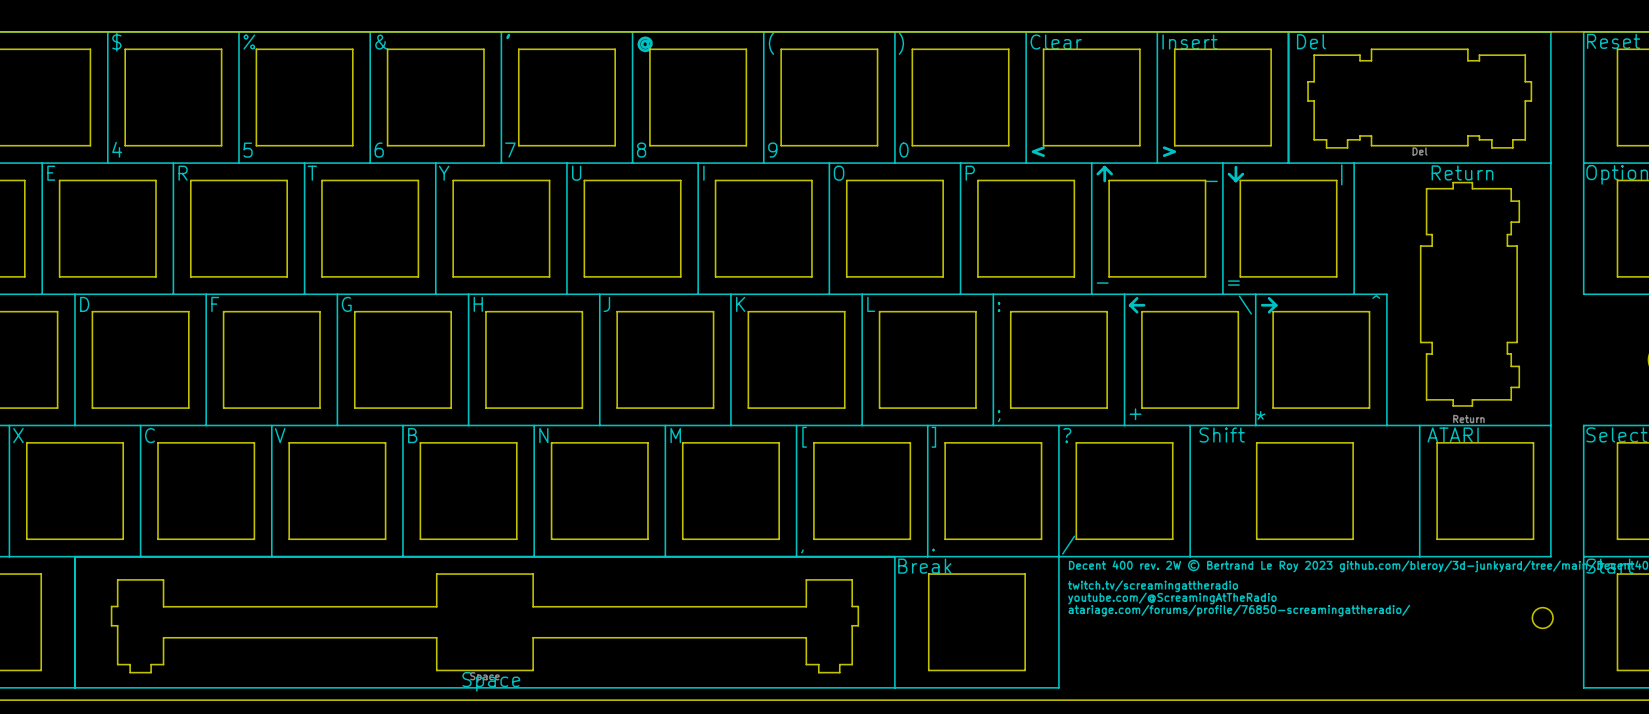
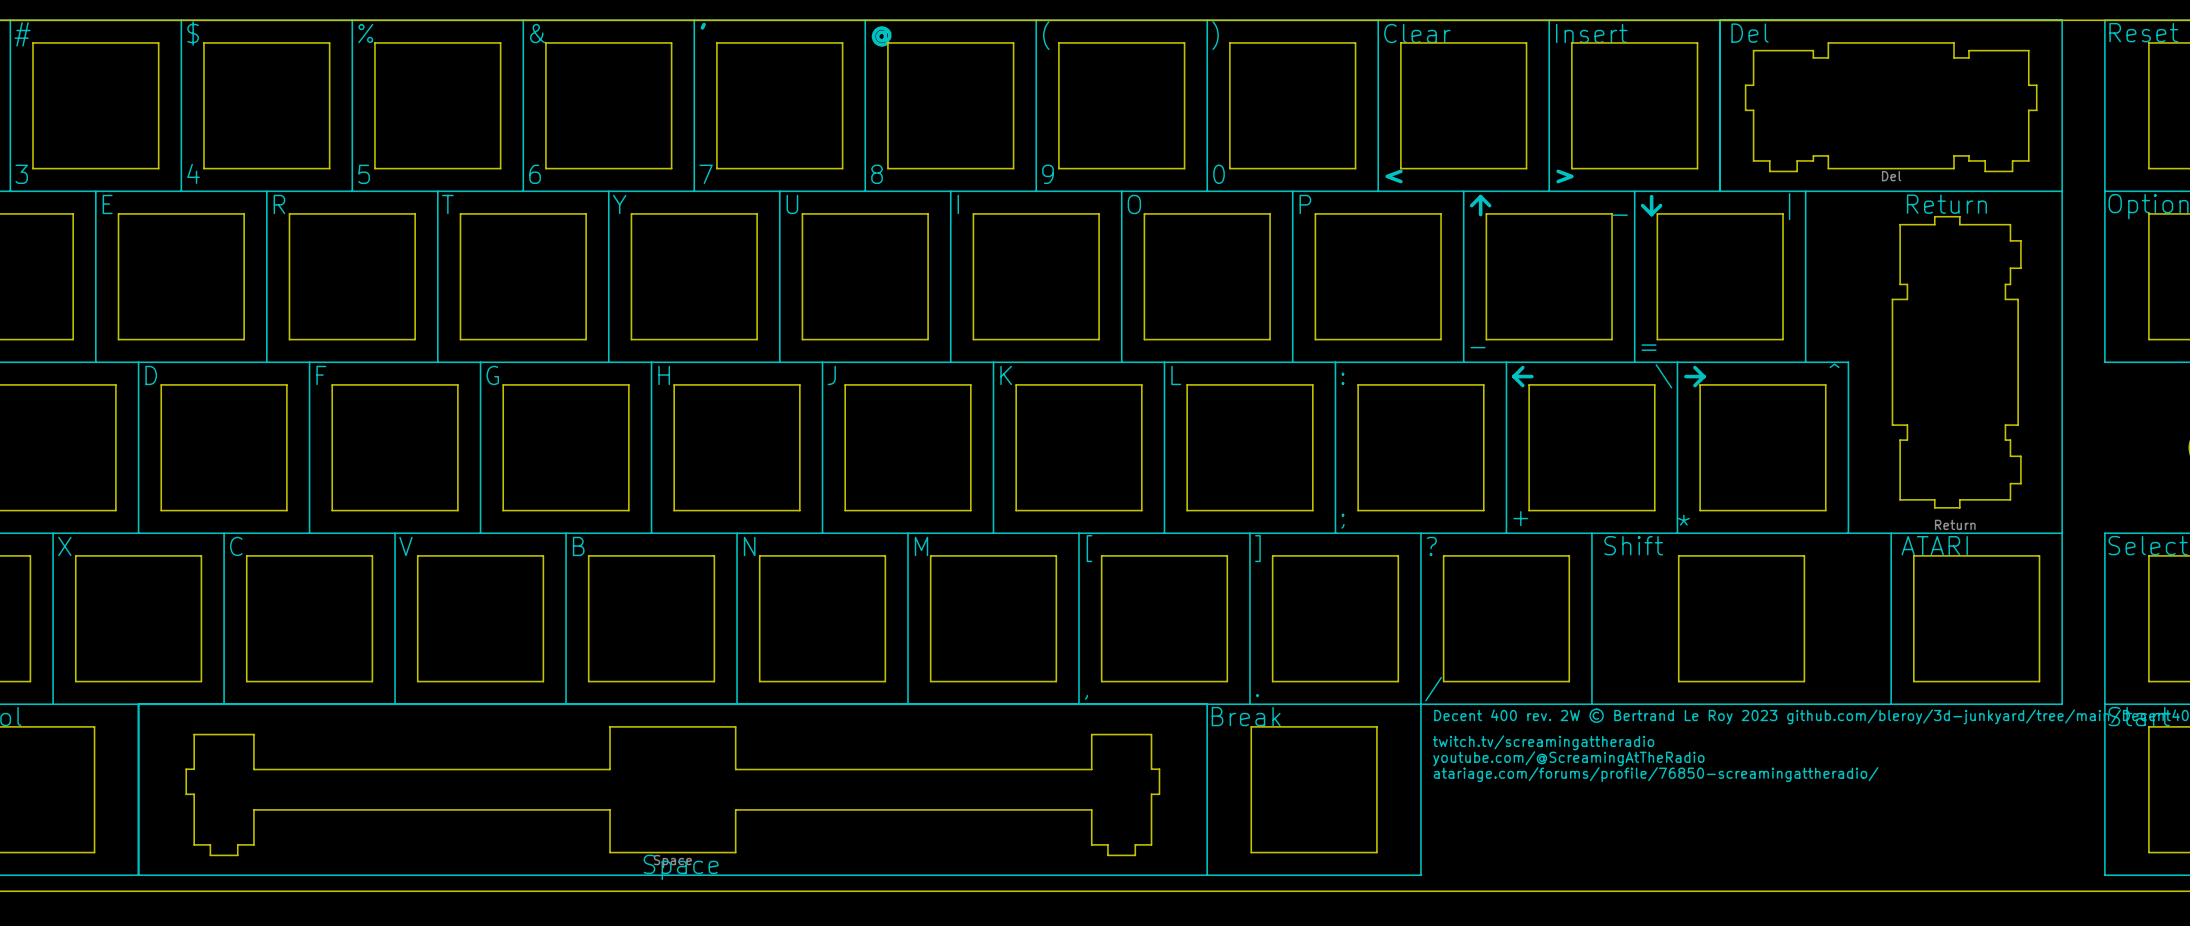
round board edge: [1532, 607, 1554, 629] -> none

